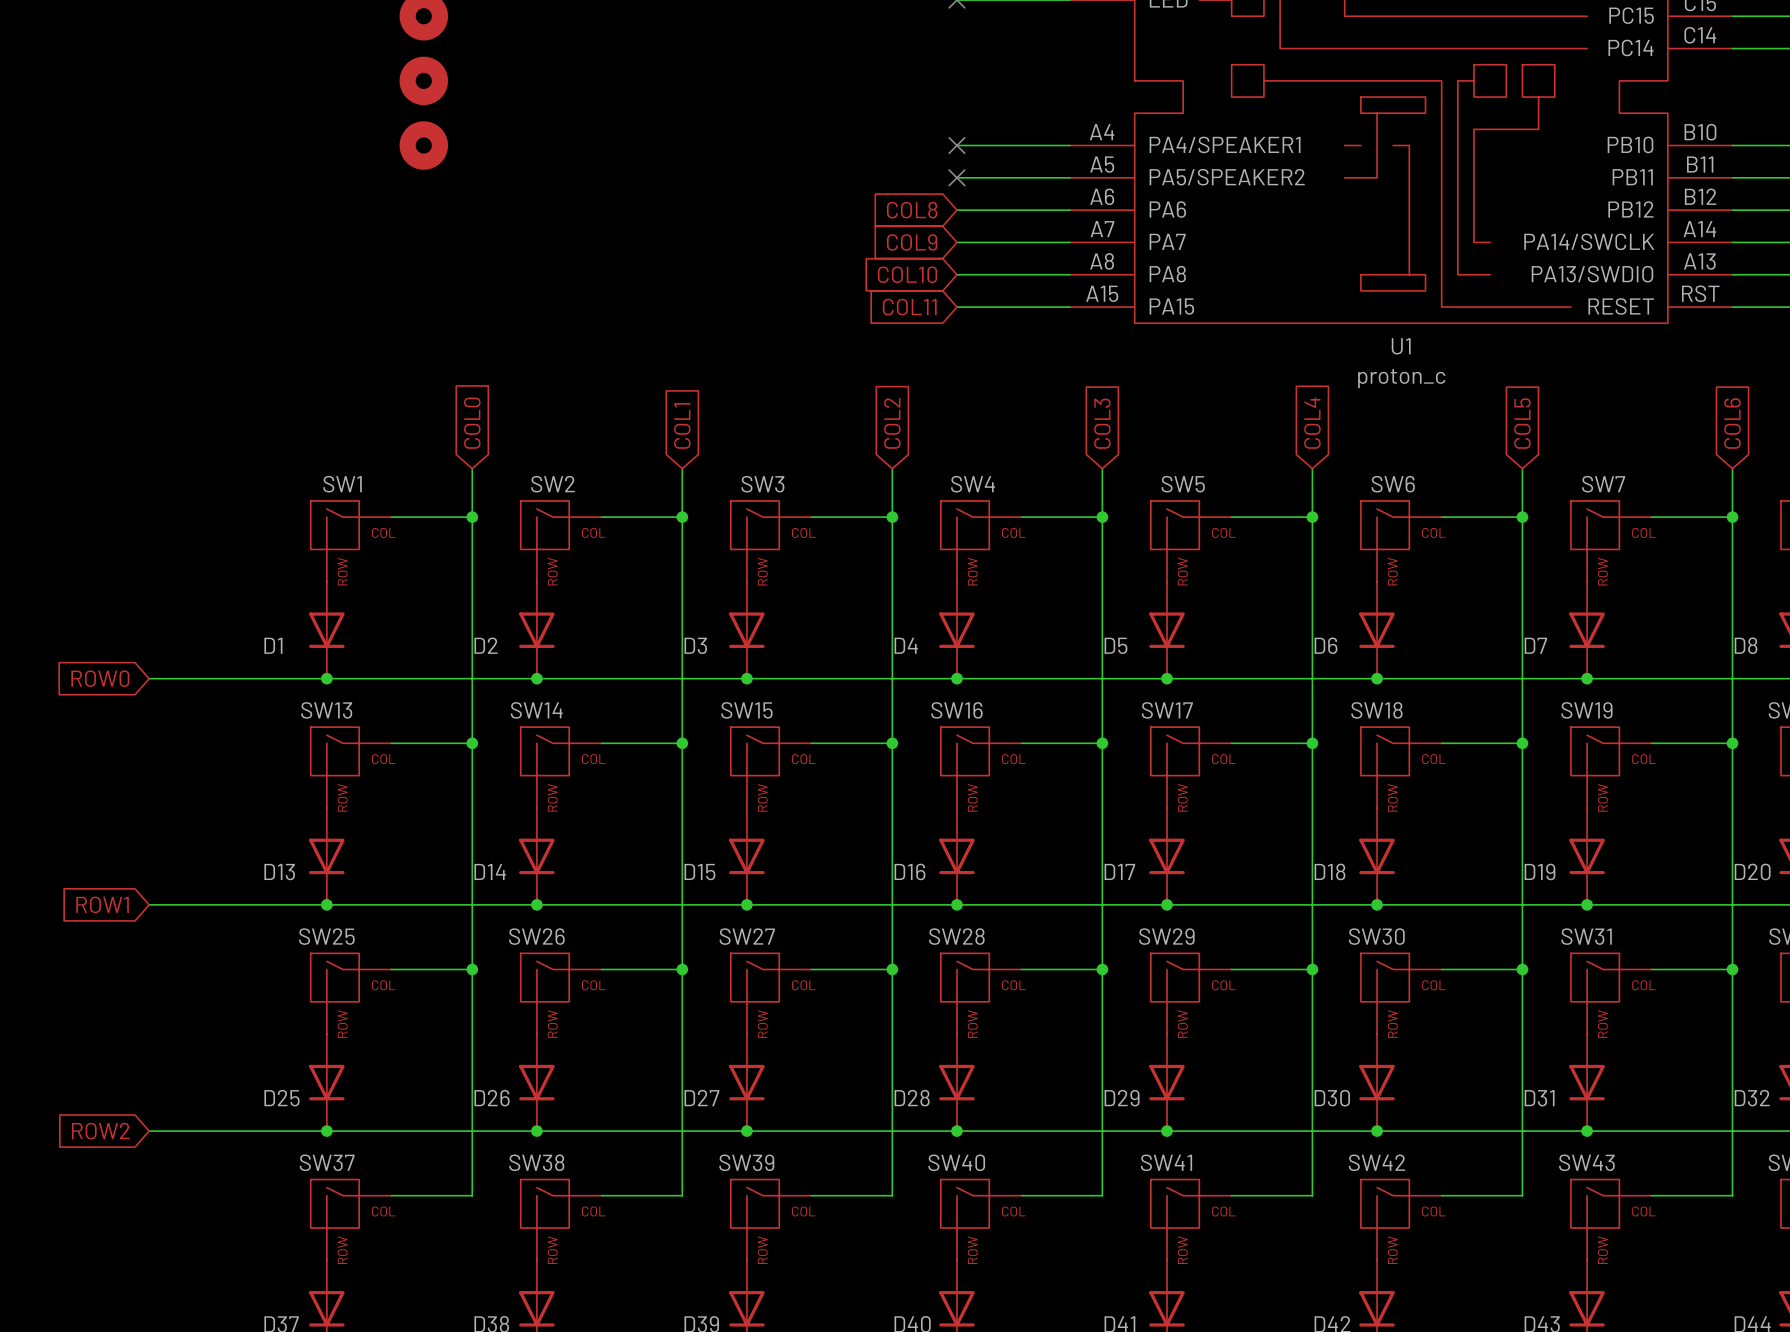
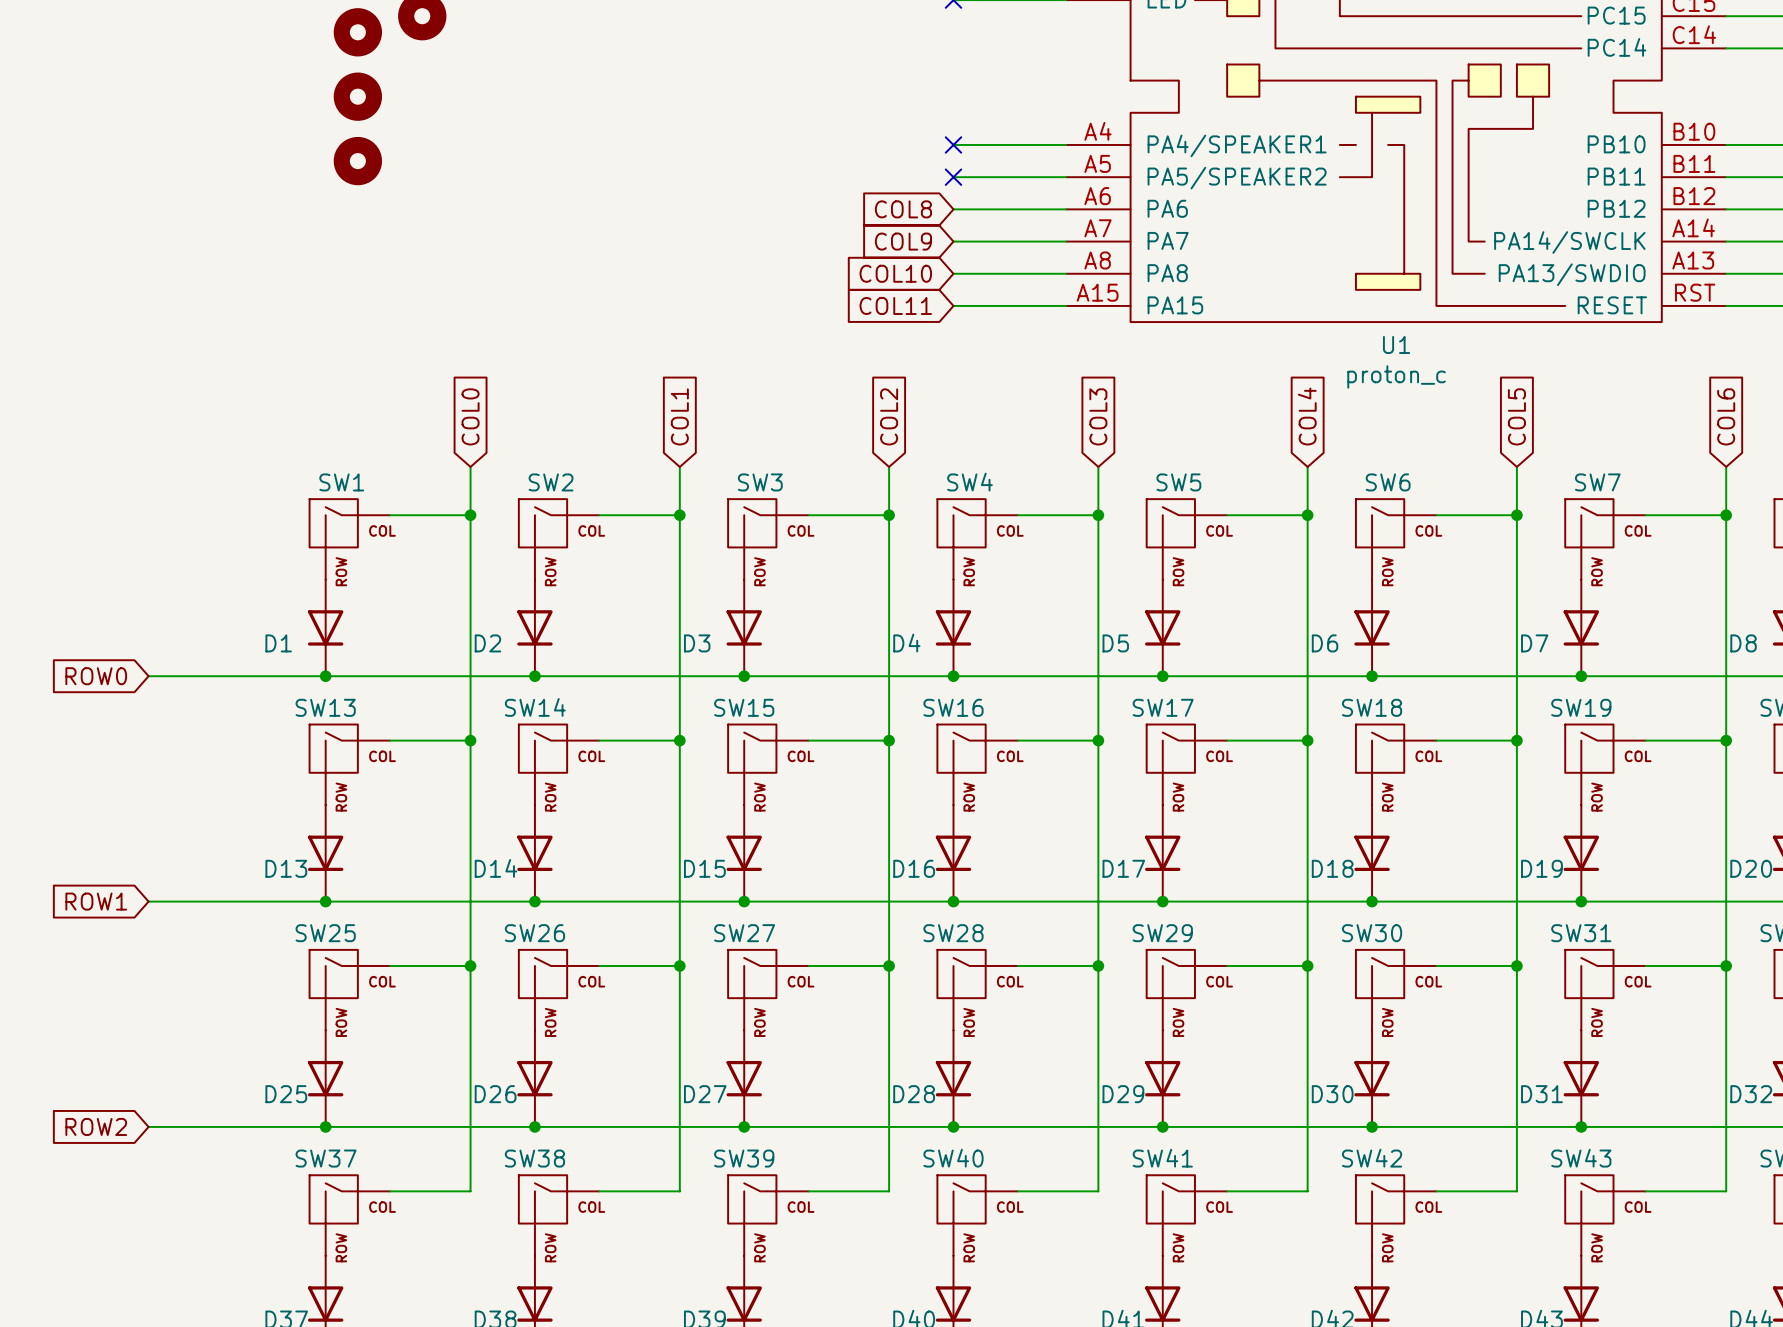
part: none -> (357, 32)
part: (423, 80) -> none
part: none -> (357, 96)
part: (423, 145) -> none
part: none -> (357, 161)

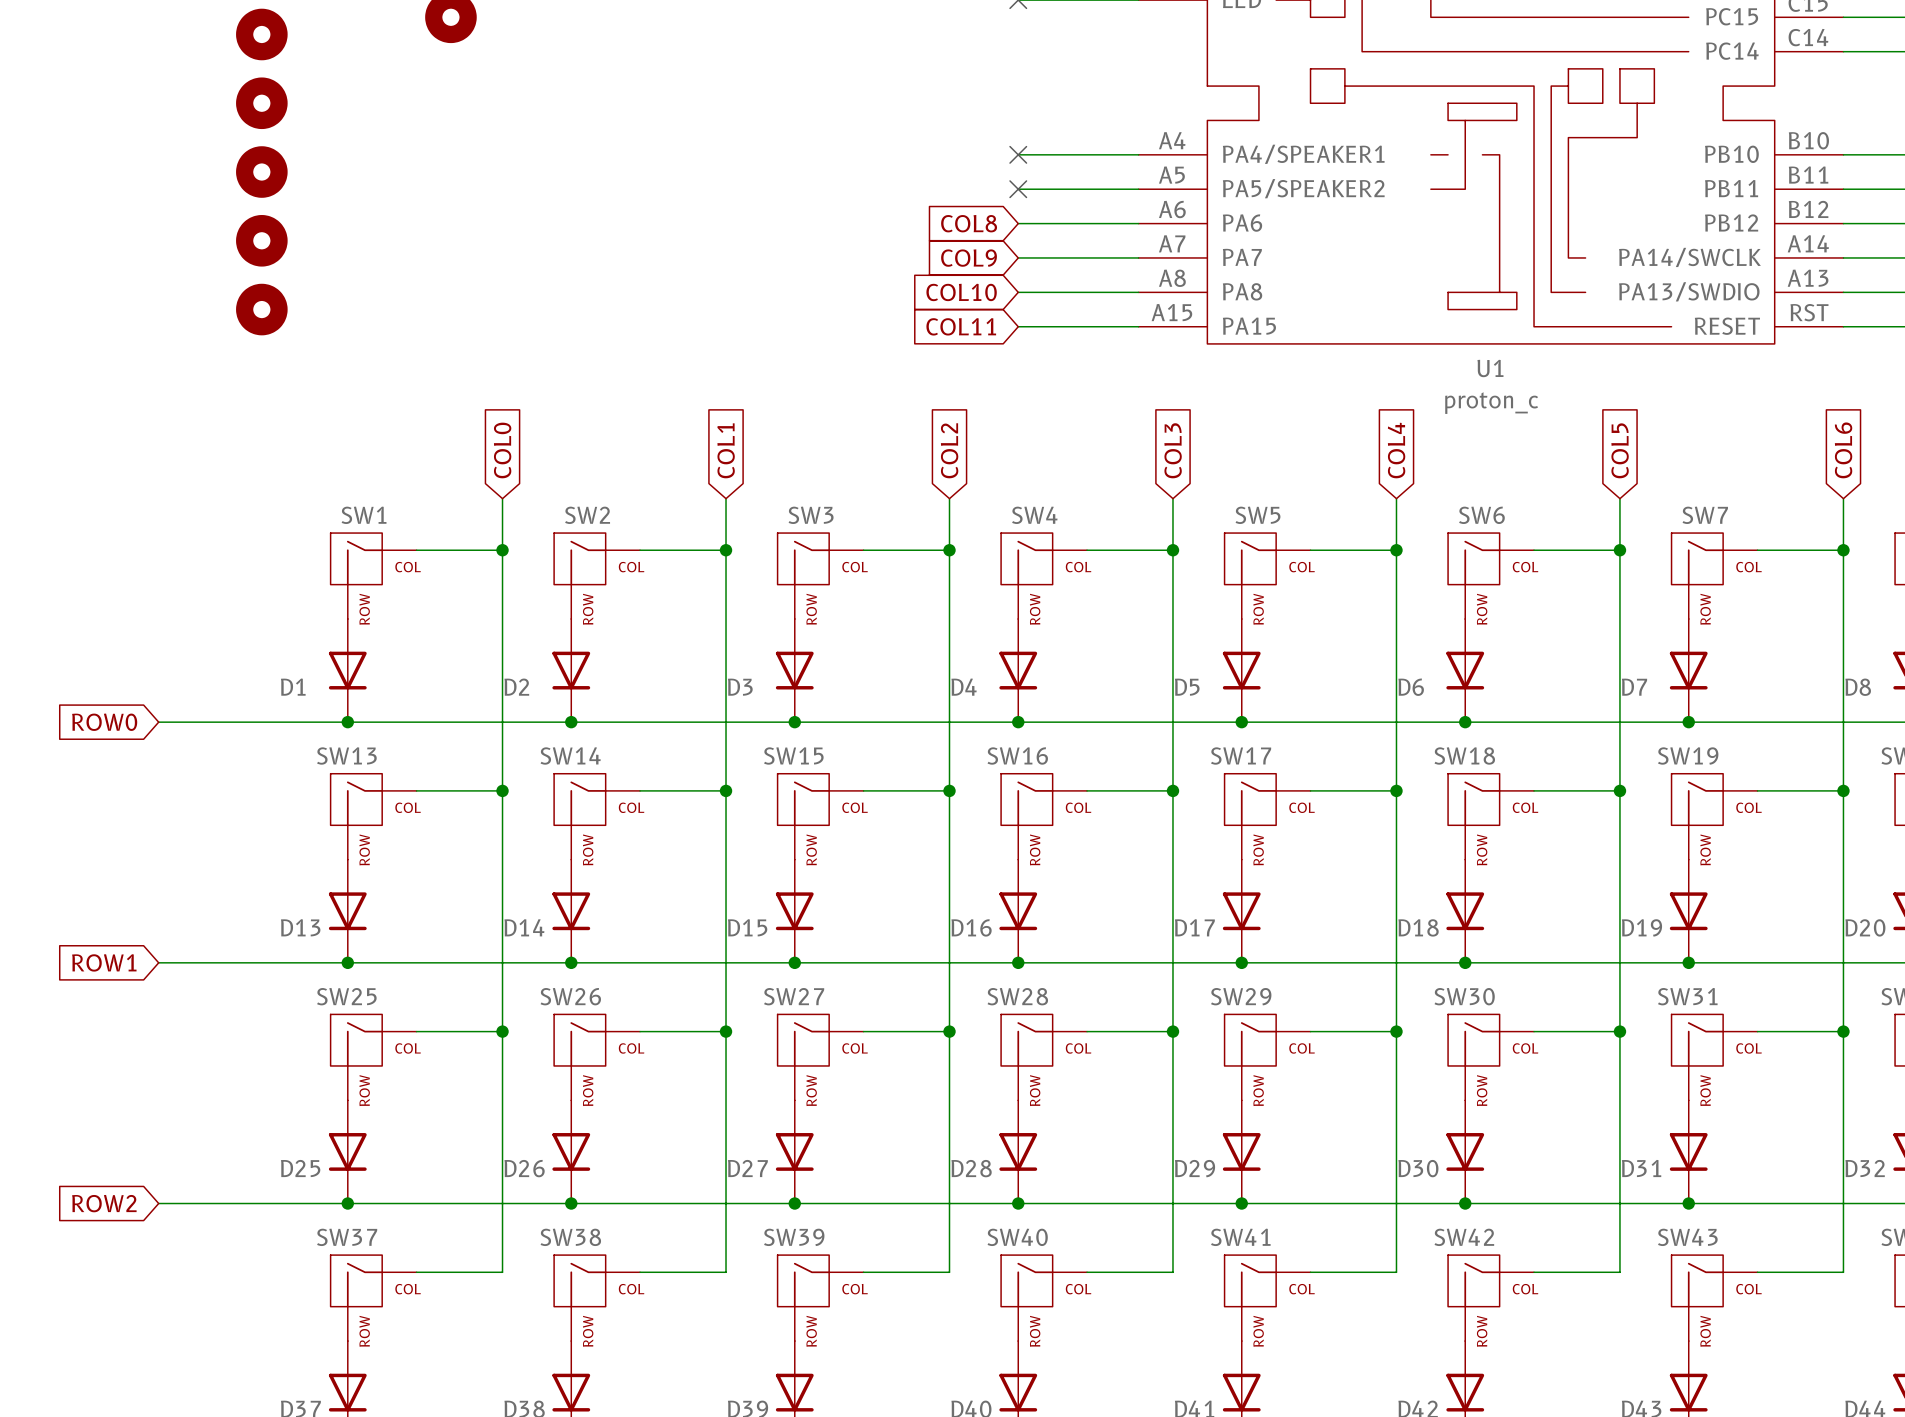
part: none -> (261, 34)
part: (357, 32) -> none
part: none -> (261, 103)
part: (357, 96) -> none
part: none -> (261, 172)
part: (357, 161) -> none
part: none -> (261, 240)
part: none -> (261, 309)

